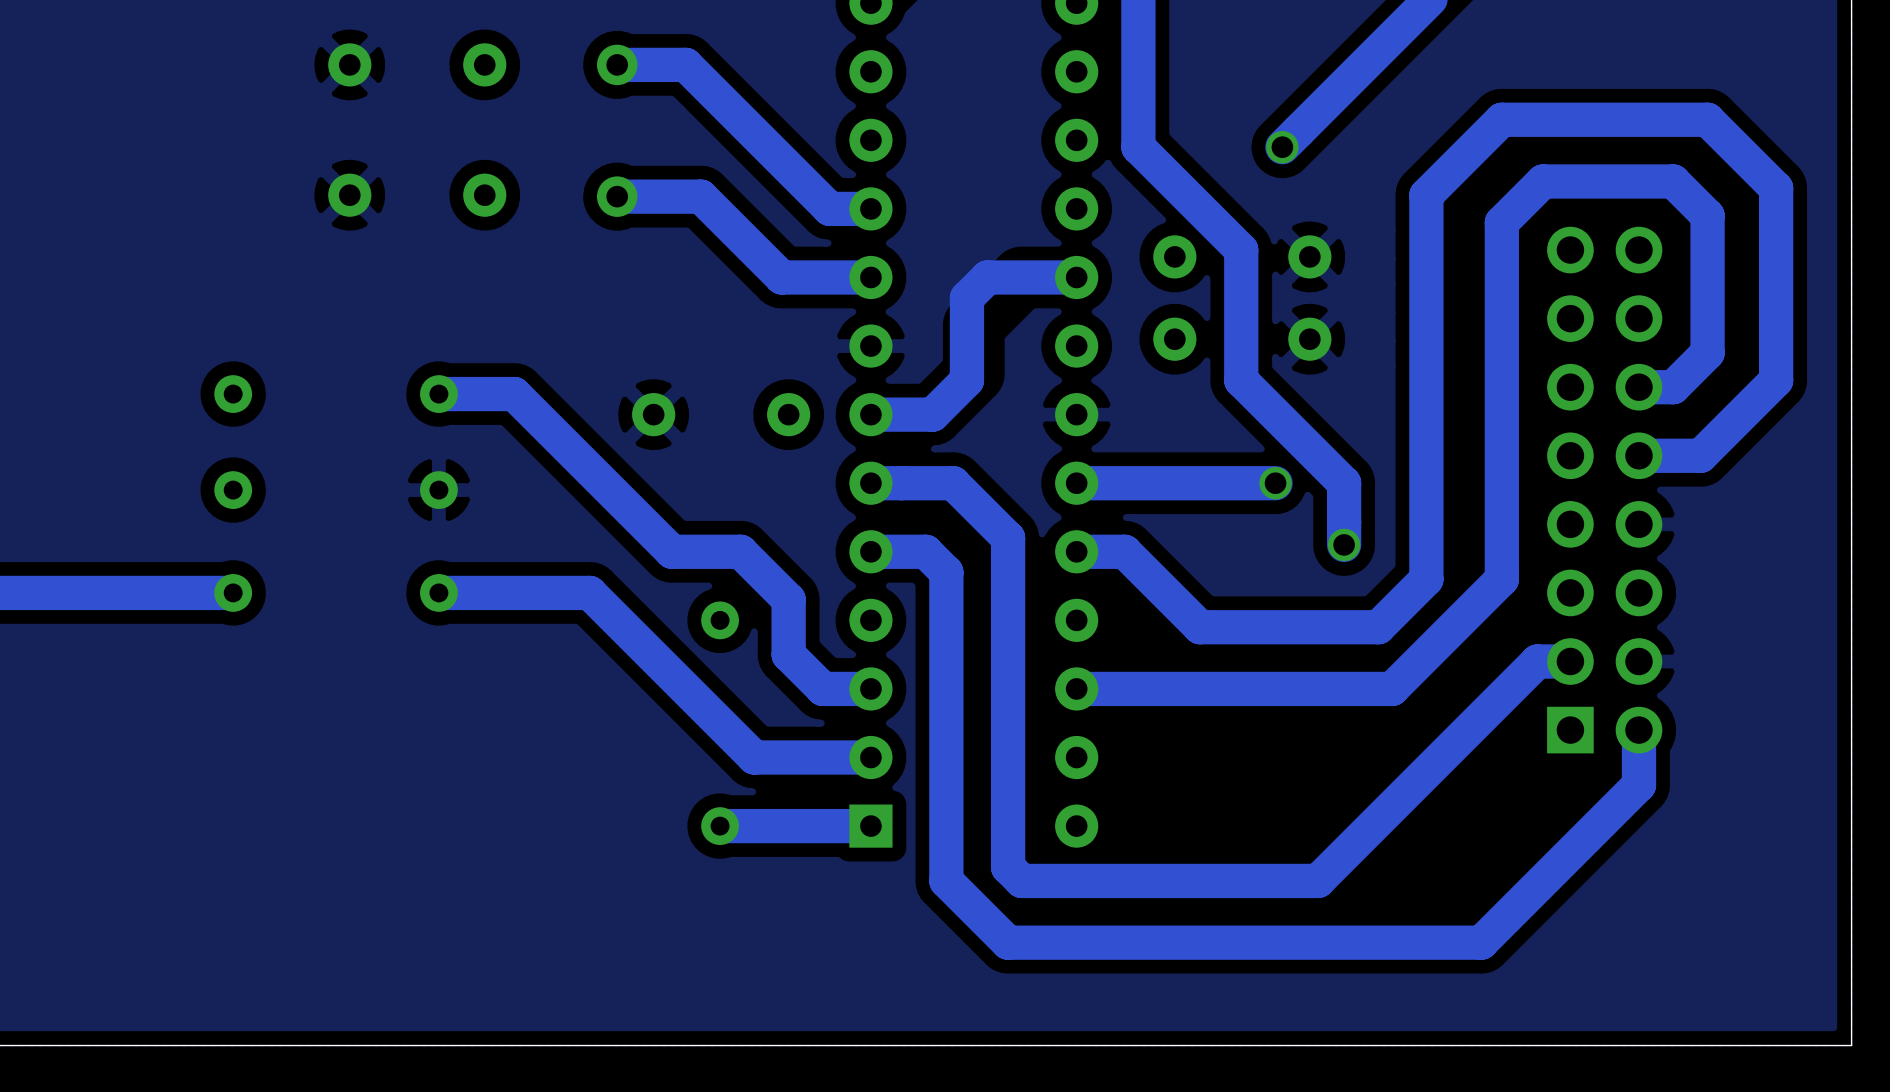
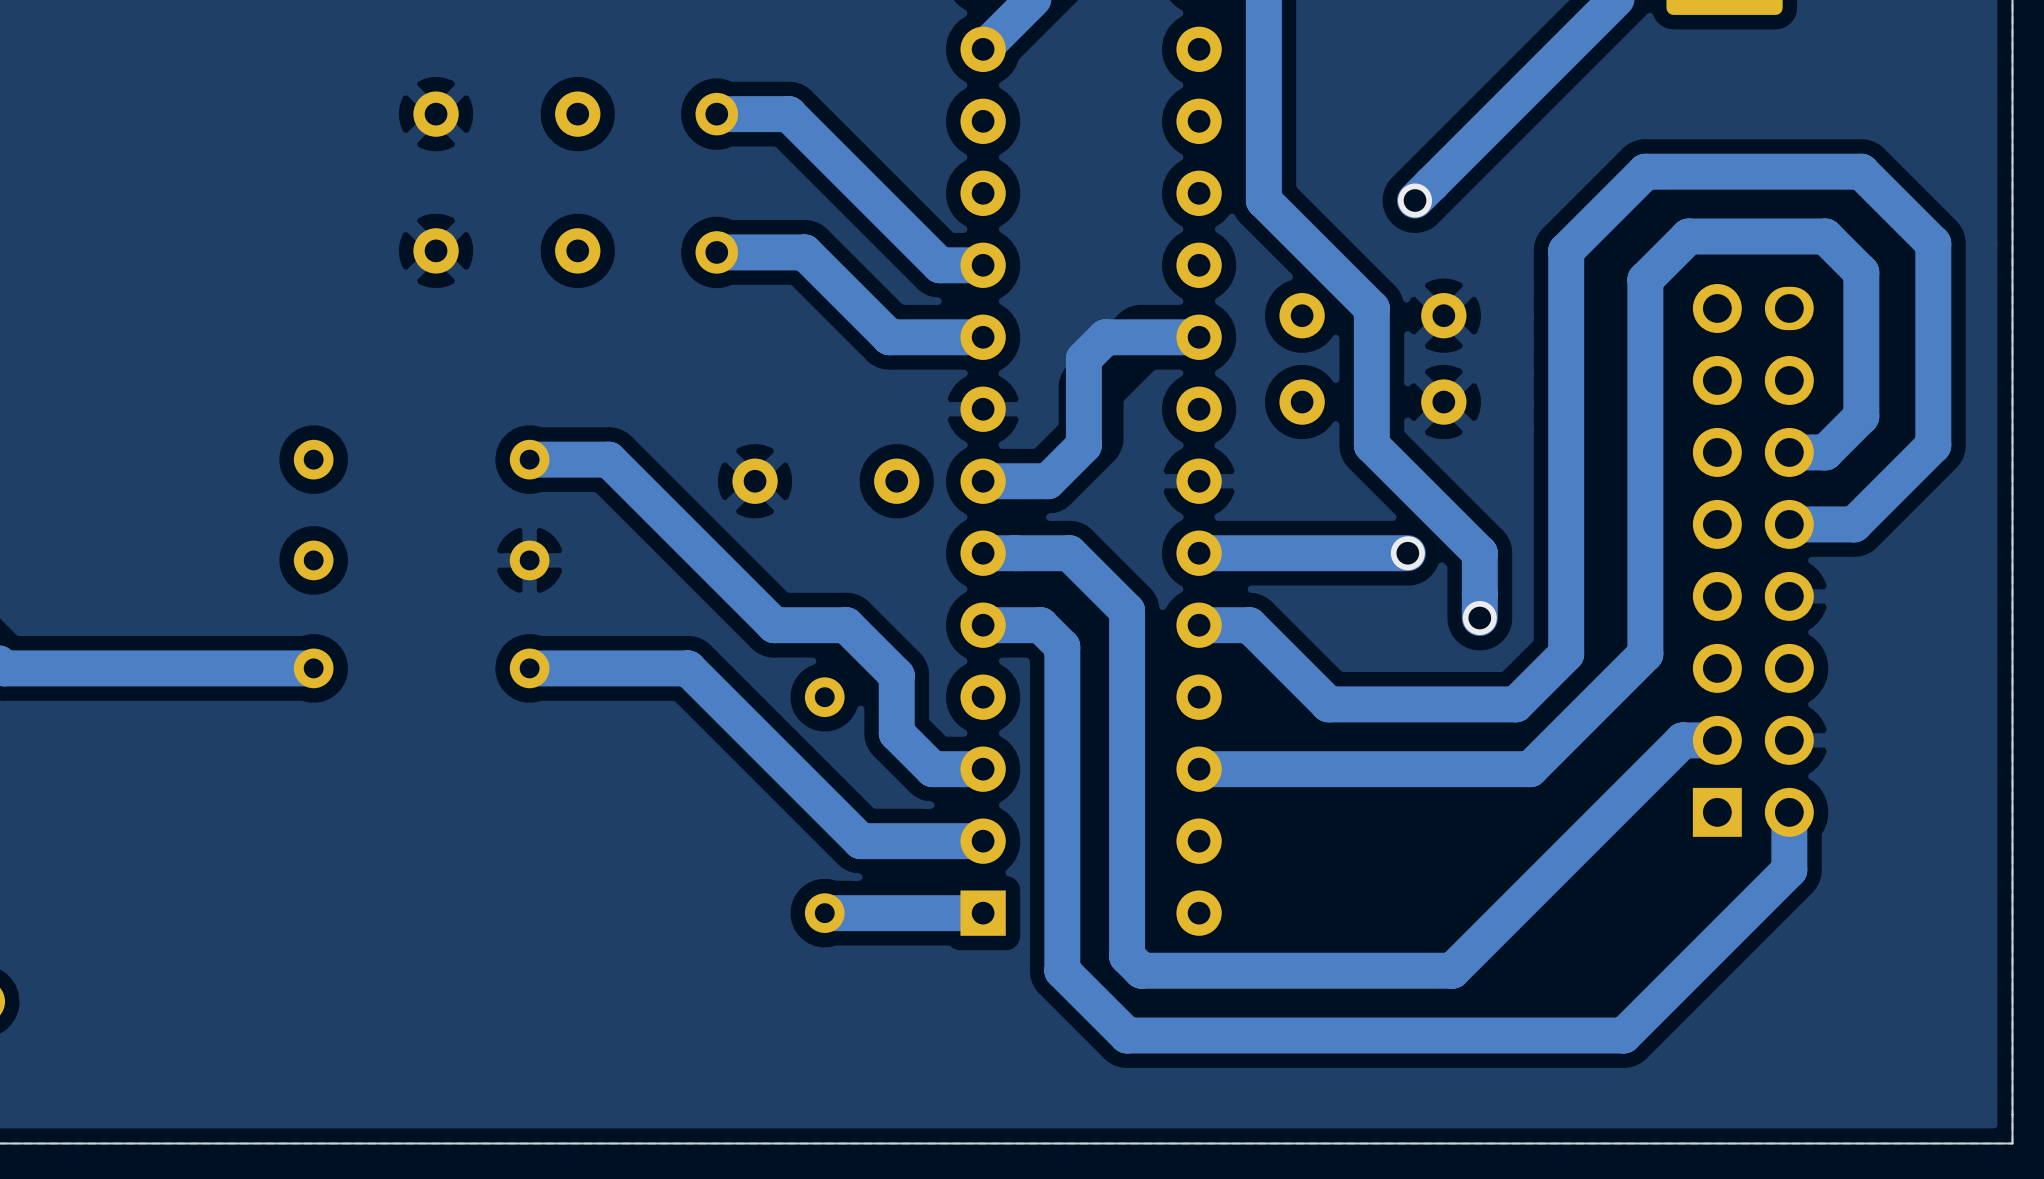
part footprint: [1547, 226, 1663, 754] -> [1692, 284, 1814, 837]

